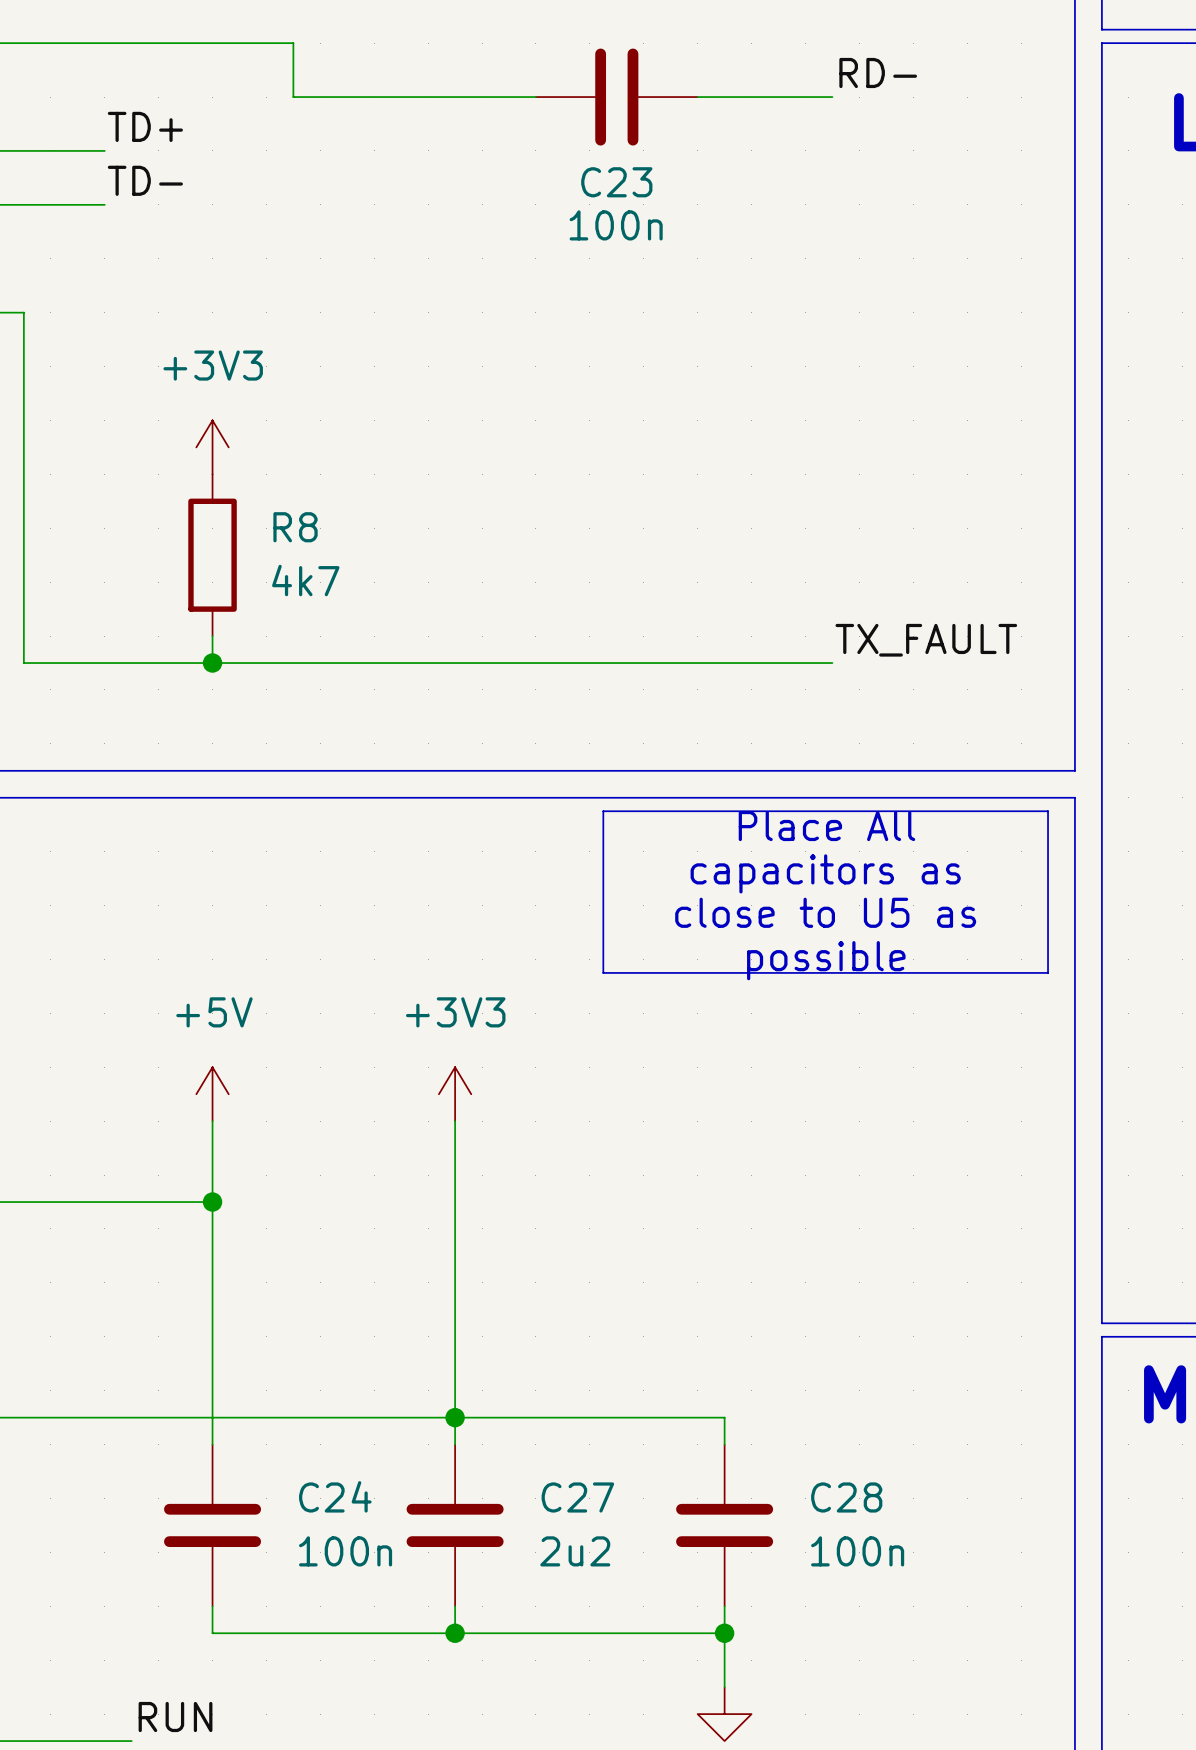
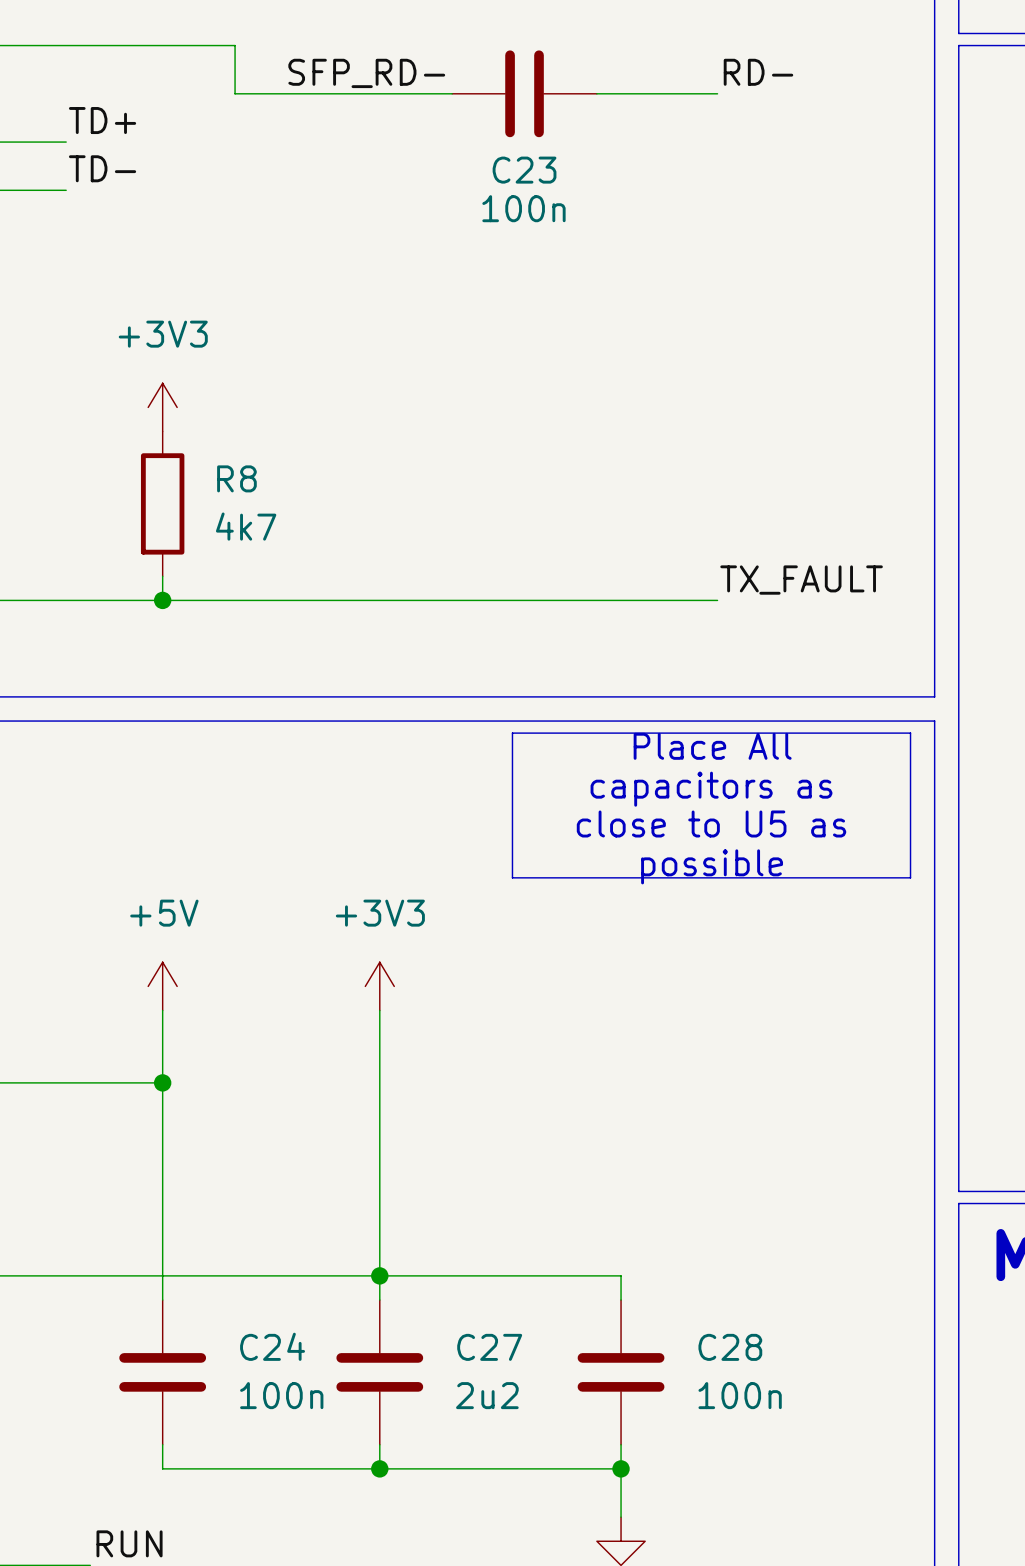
label: none -> SFP_RD- (366, 73)

